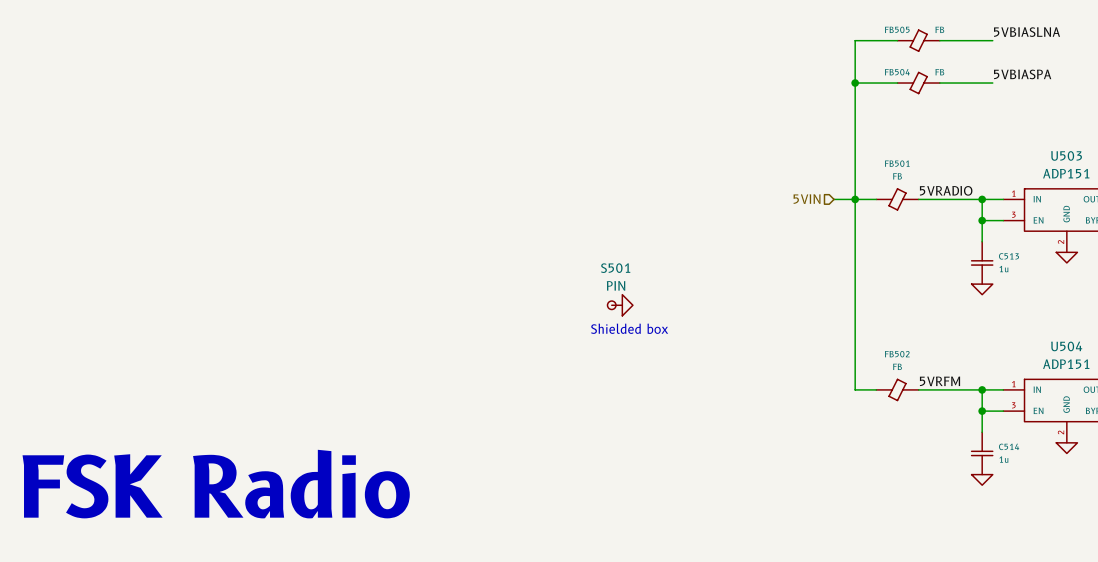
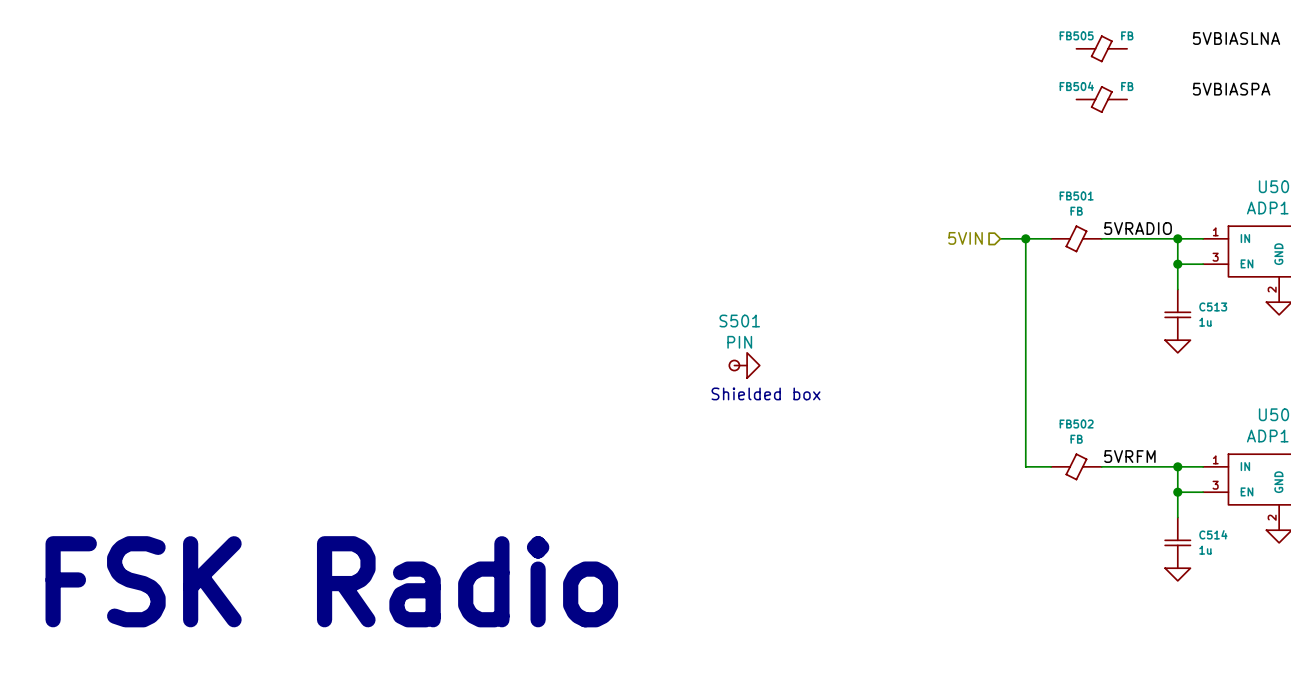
wire: (897, 40) (855, 40) (855, 199) -> none
wire: (939, 40) (992, 40) -> none
wire: (855, 83) (897, 83) -> none
junction: (855, 83) -> none
wire: (939, 83) (992, 83) -> none

